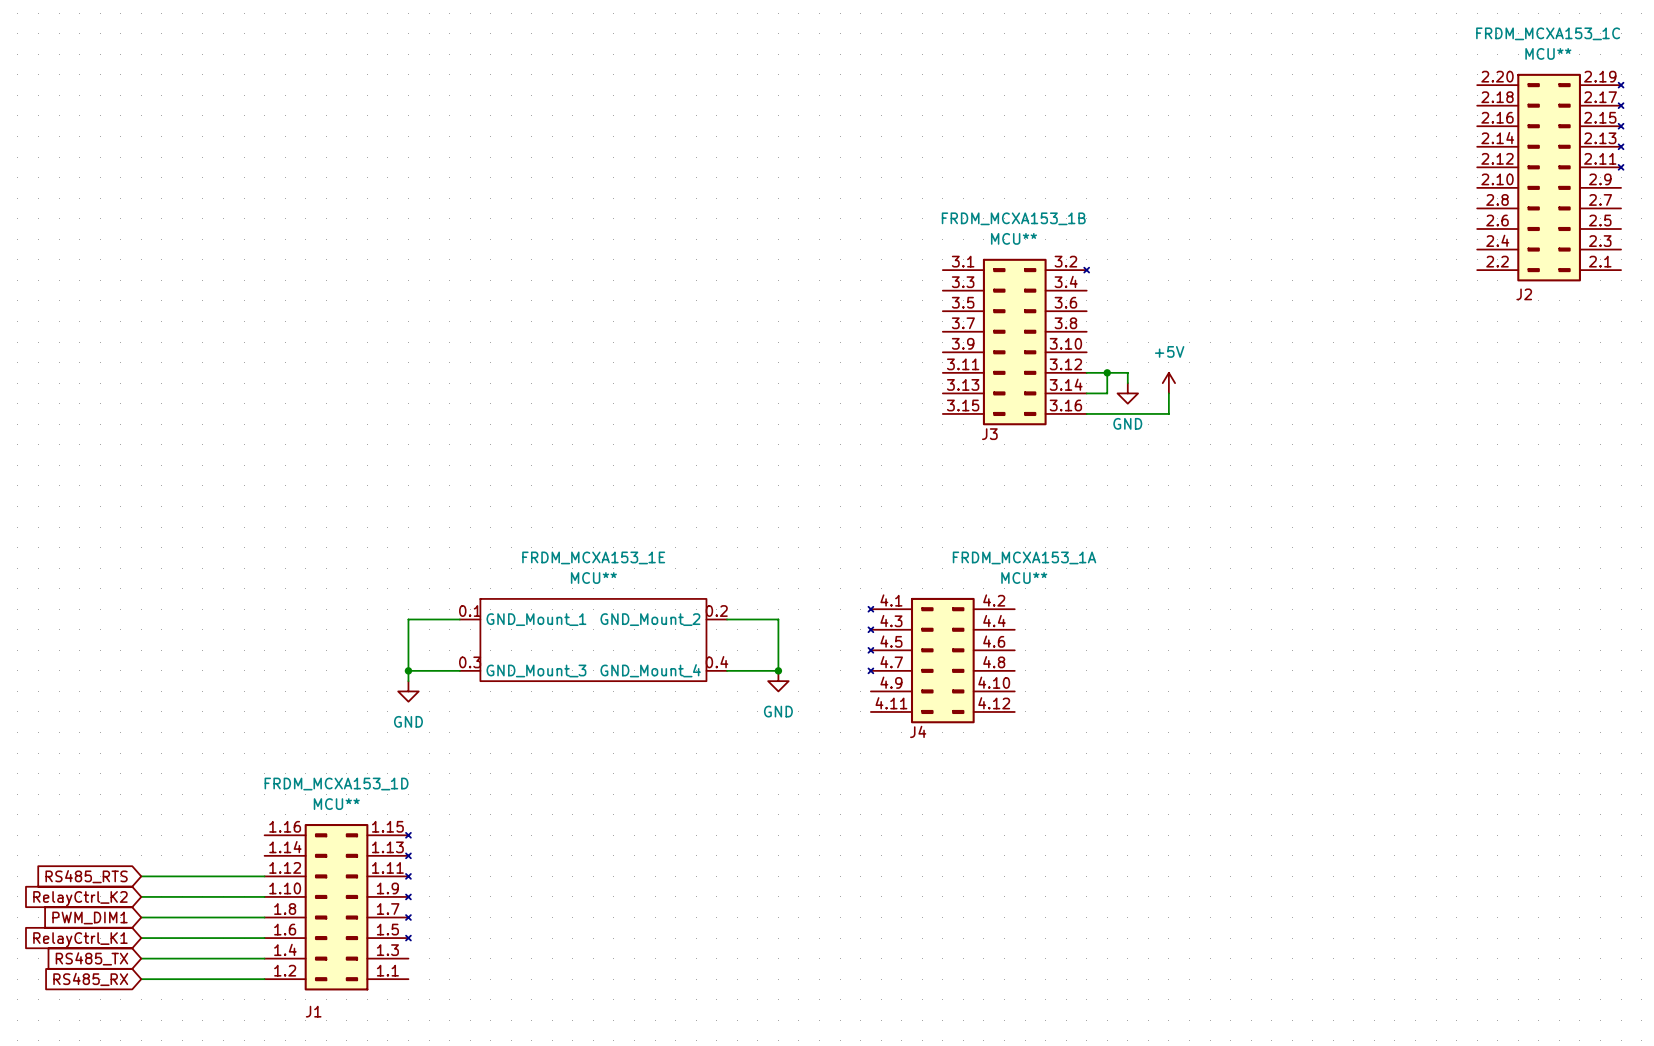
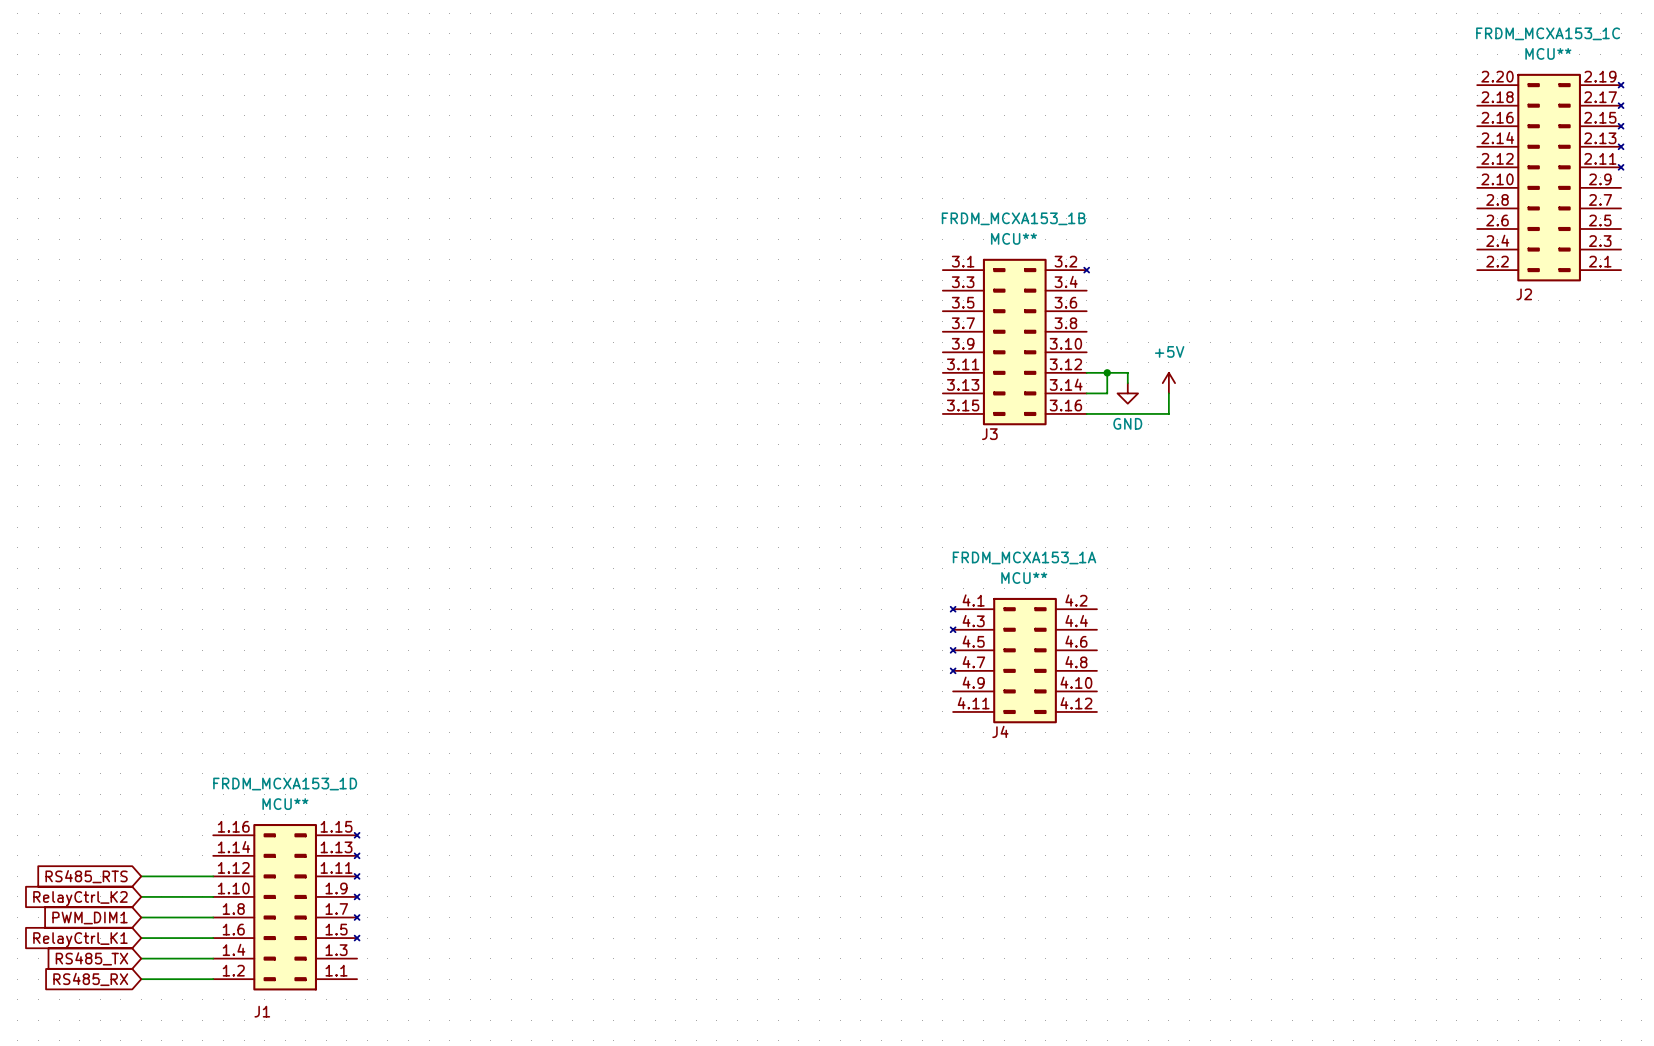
wire: (459, 619) (408, 619) (408, 681) -> none
wire: (727, 619) (778, 619) (778, 670) (727, 670) -> none
FRDM_MCXA153_1E: MCU** (593, 640) -> none
FRDM_MCXA153_1A position: (941, 660) -> (1023, 660)
wire: (408, 670) (459, 670) -> none
junction: (408, 670) -> none
junction: (778, 670) -> none
power symbol: GND (778, 681) -> none
power symbol: GND (408, 691) -> none
FRDM_MCXA153_1D position: (337, 907) -> (286, 907)

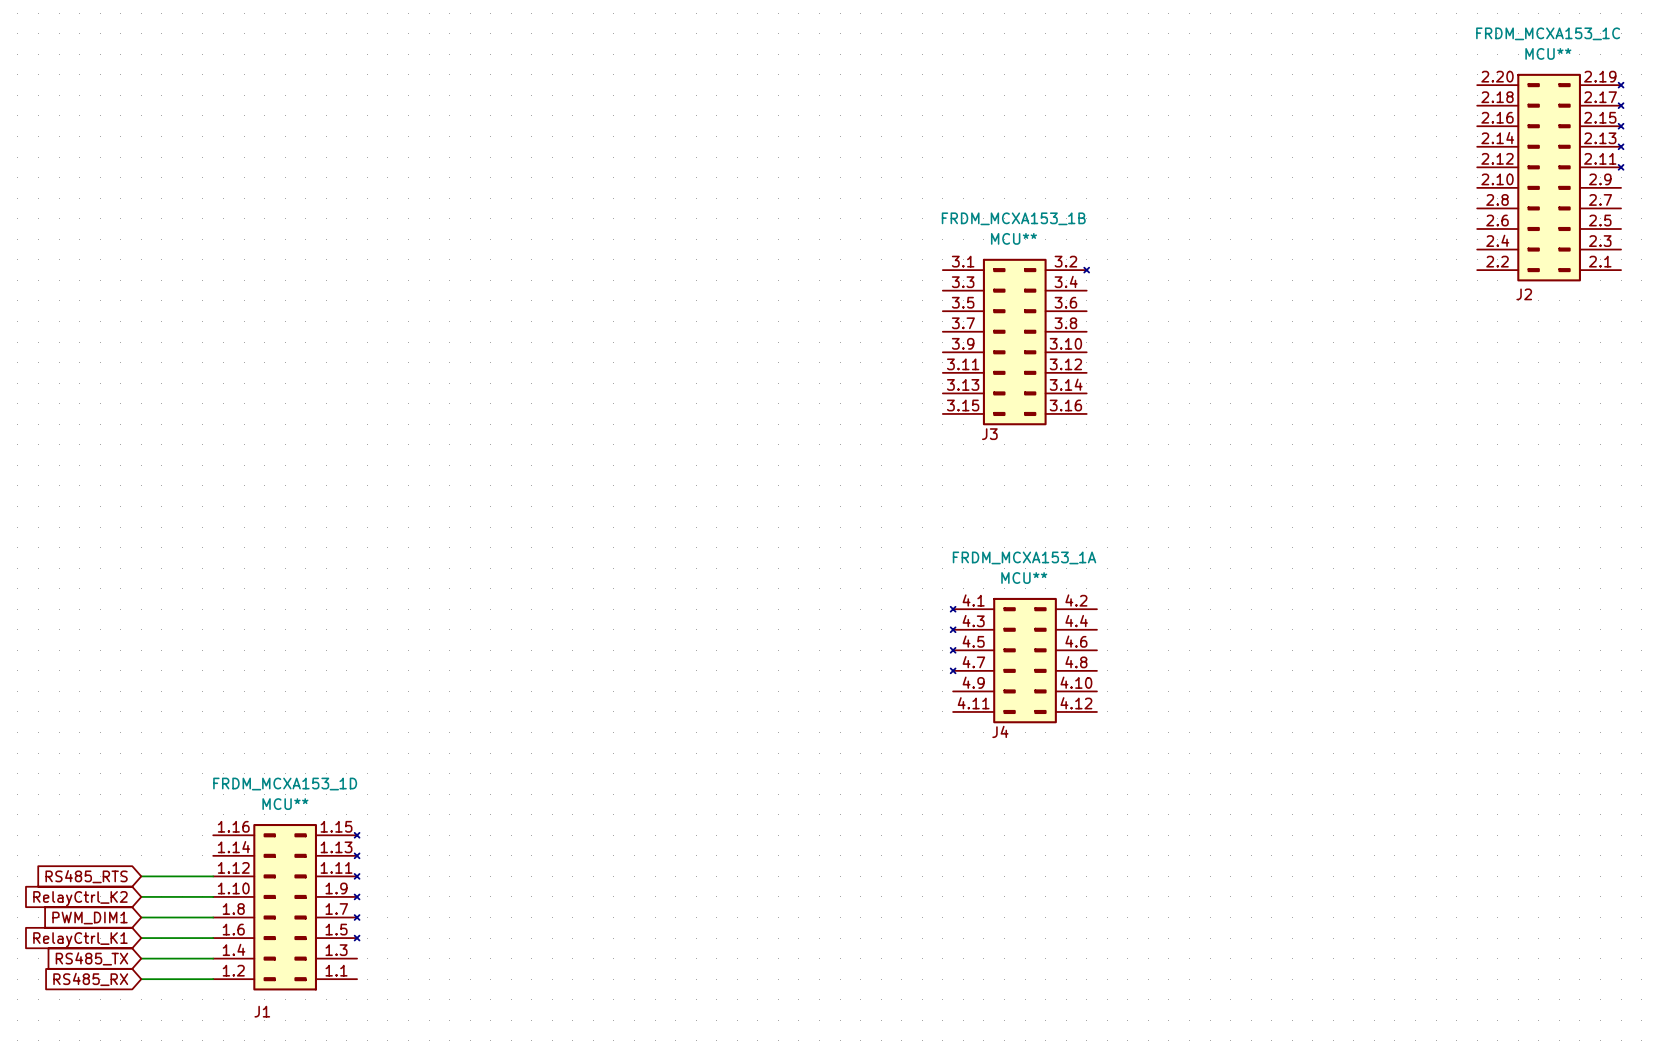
wire: (1086, 372) (1127, 372) (1127, 383) -> none
wire: (1107, 372) (1107, 393) (1086, 393) -> none
junction: (1107, 372) -> none
power symbol: +5V (1168, 383) -> none
power symbol: GND (1127, 393) -> none
wire: (1168, 393) (1168, 413) (1086, 413) -> none

